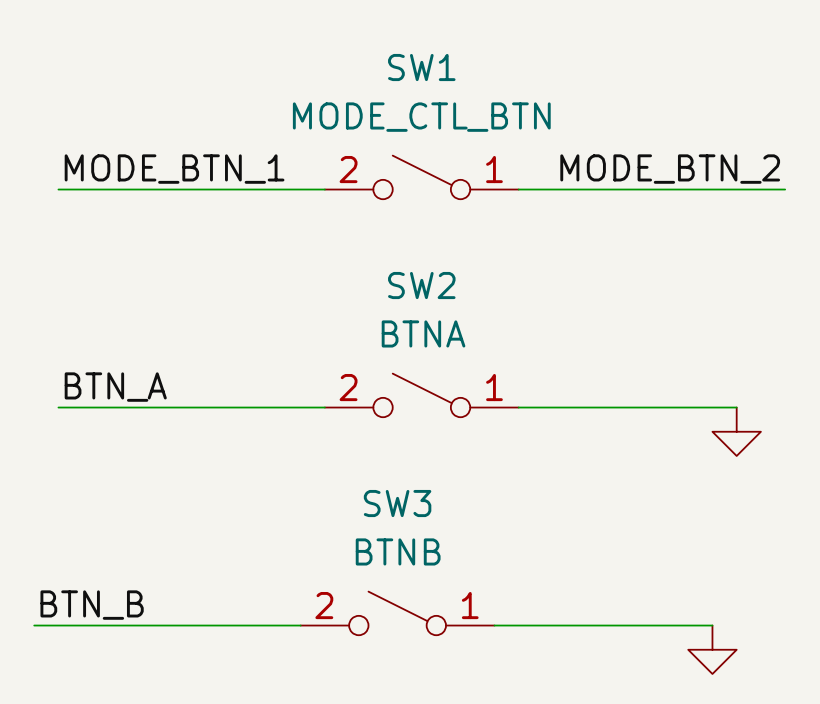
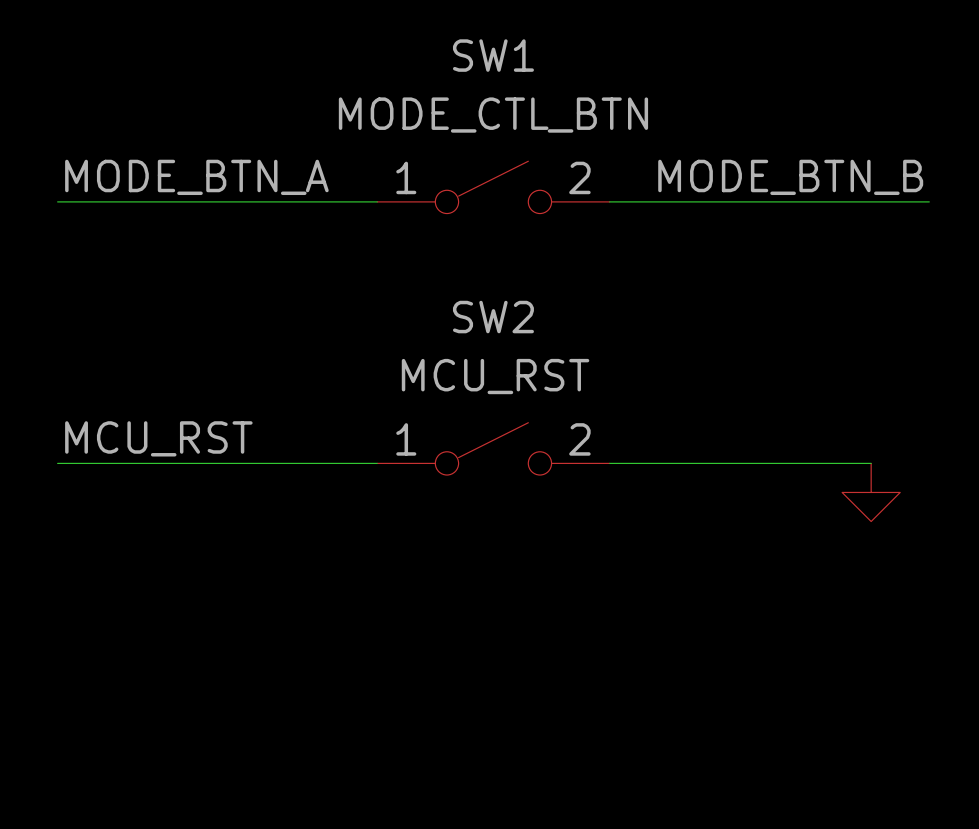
label: MODE_BTN_1 (174, 169) -> MODE_BTN_A (196, 177)
label: MODE_BTN_2 (670, 169) -> MODE_BTN_B (790, 177)
SW1 flip: as is (421, 177) -> left-right (493, 187)
SW2 value: BTNA (423, 333) -> MCU_RST (495, 376)
label: BTN_A (115, 387) -> MCU_RST (158, 438)
SW2 flip: as is (421, 395) -> left-right (493, 448)
label: BTN_B (92, 605) -> none
SW3: BTNB (397, 613) -> none
wire: (34, 625) (300, 625) -> none
wire: (494, 625) (712, 625) -> none
power symbol: (712, 649) -> none

